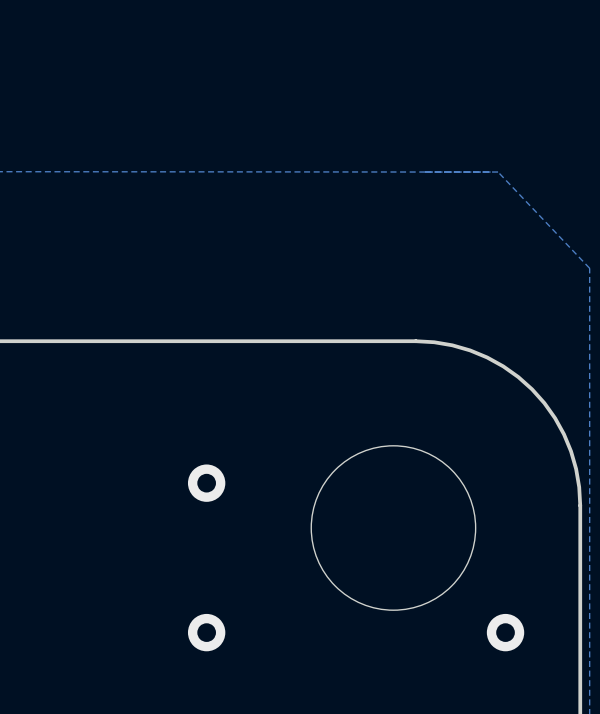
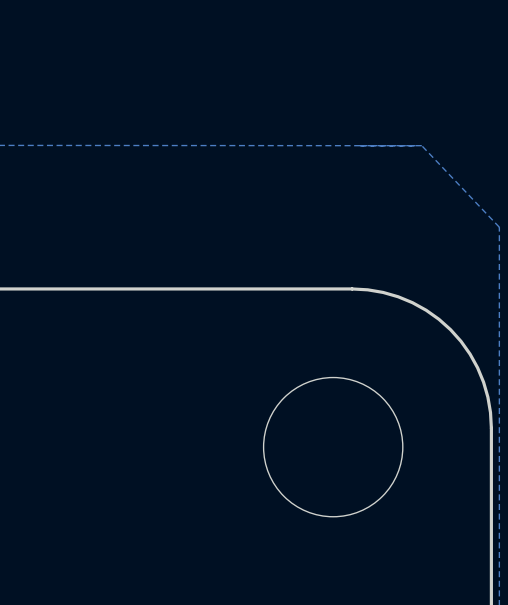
via: (206, 483) -> none
via: (206, 632) -> none
via: (505, 632) -> none

